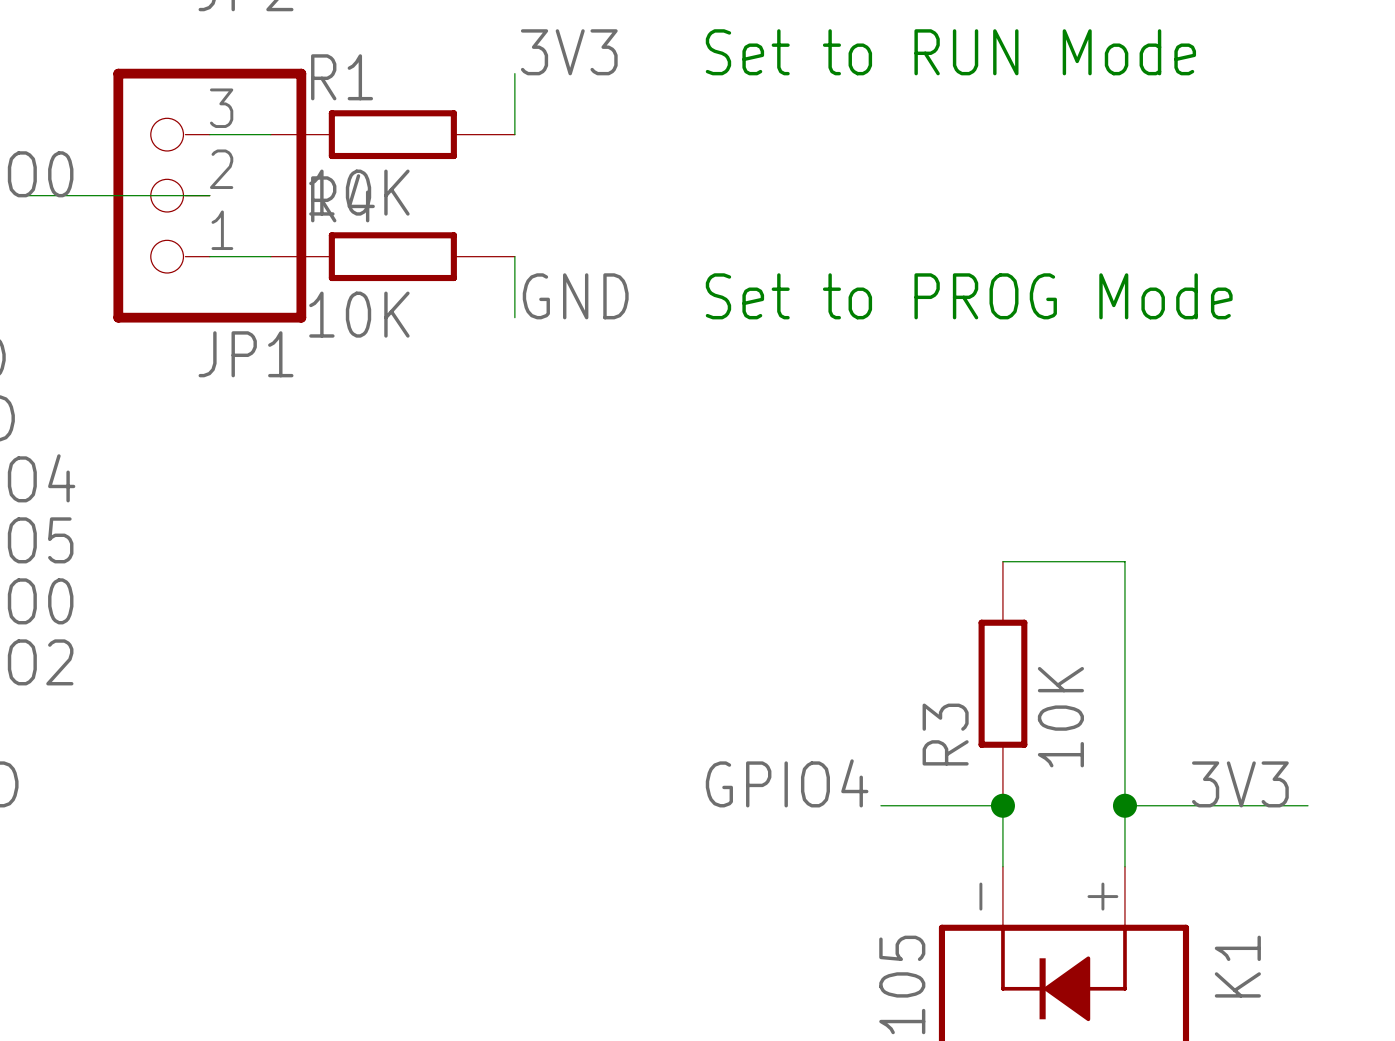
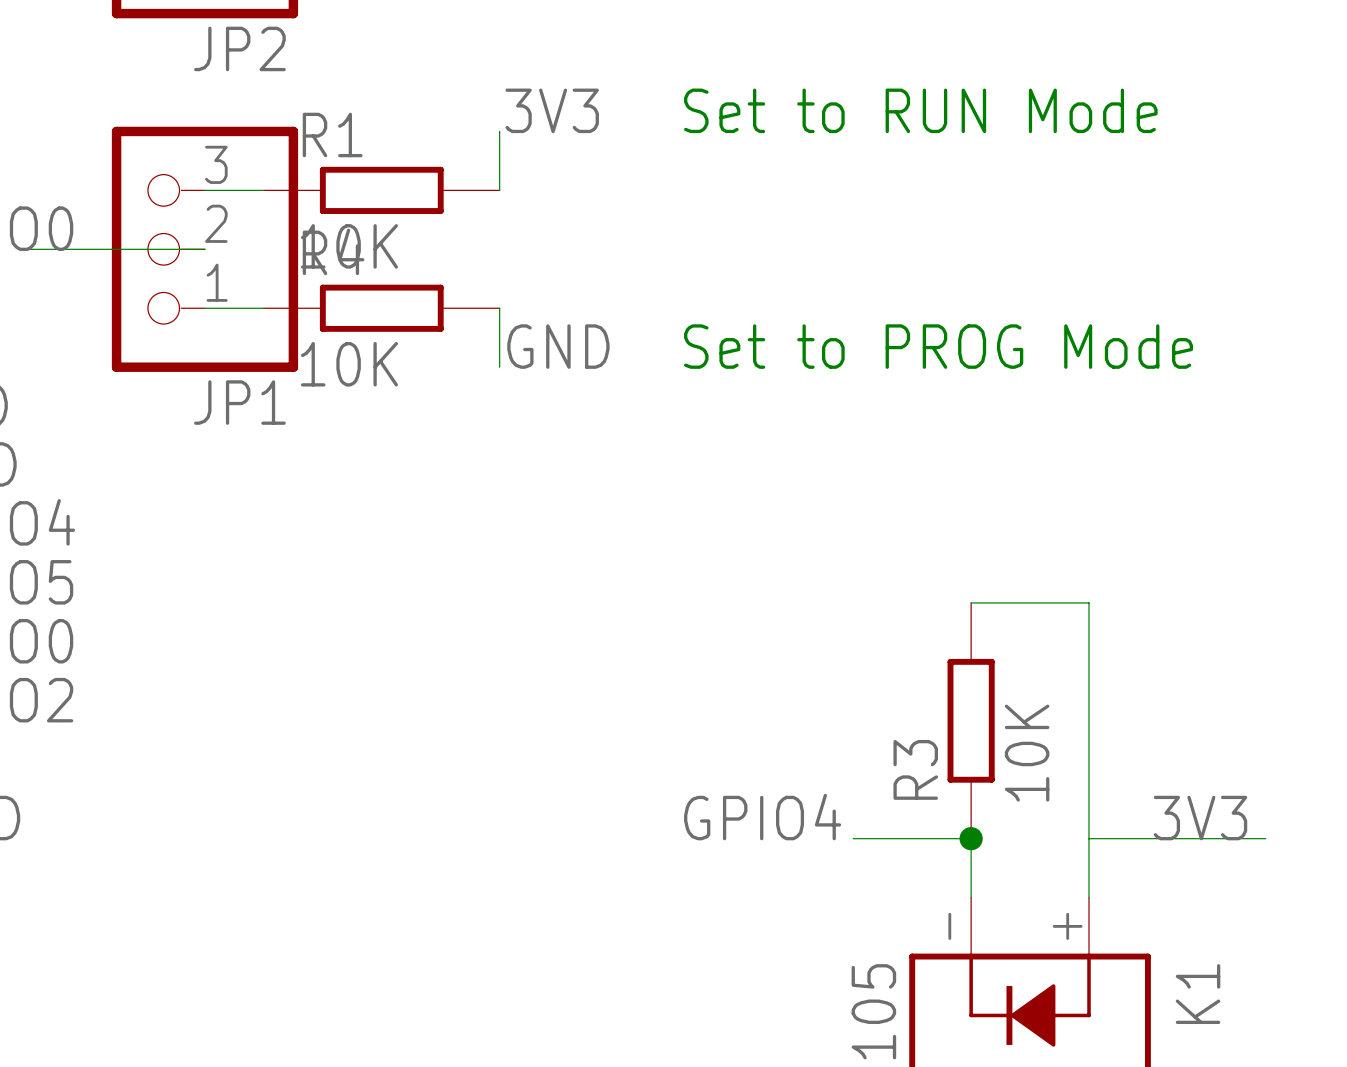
junction: (1124, 805) -> none

